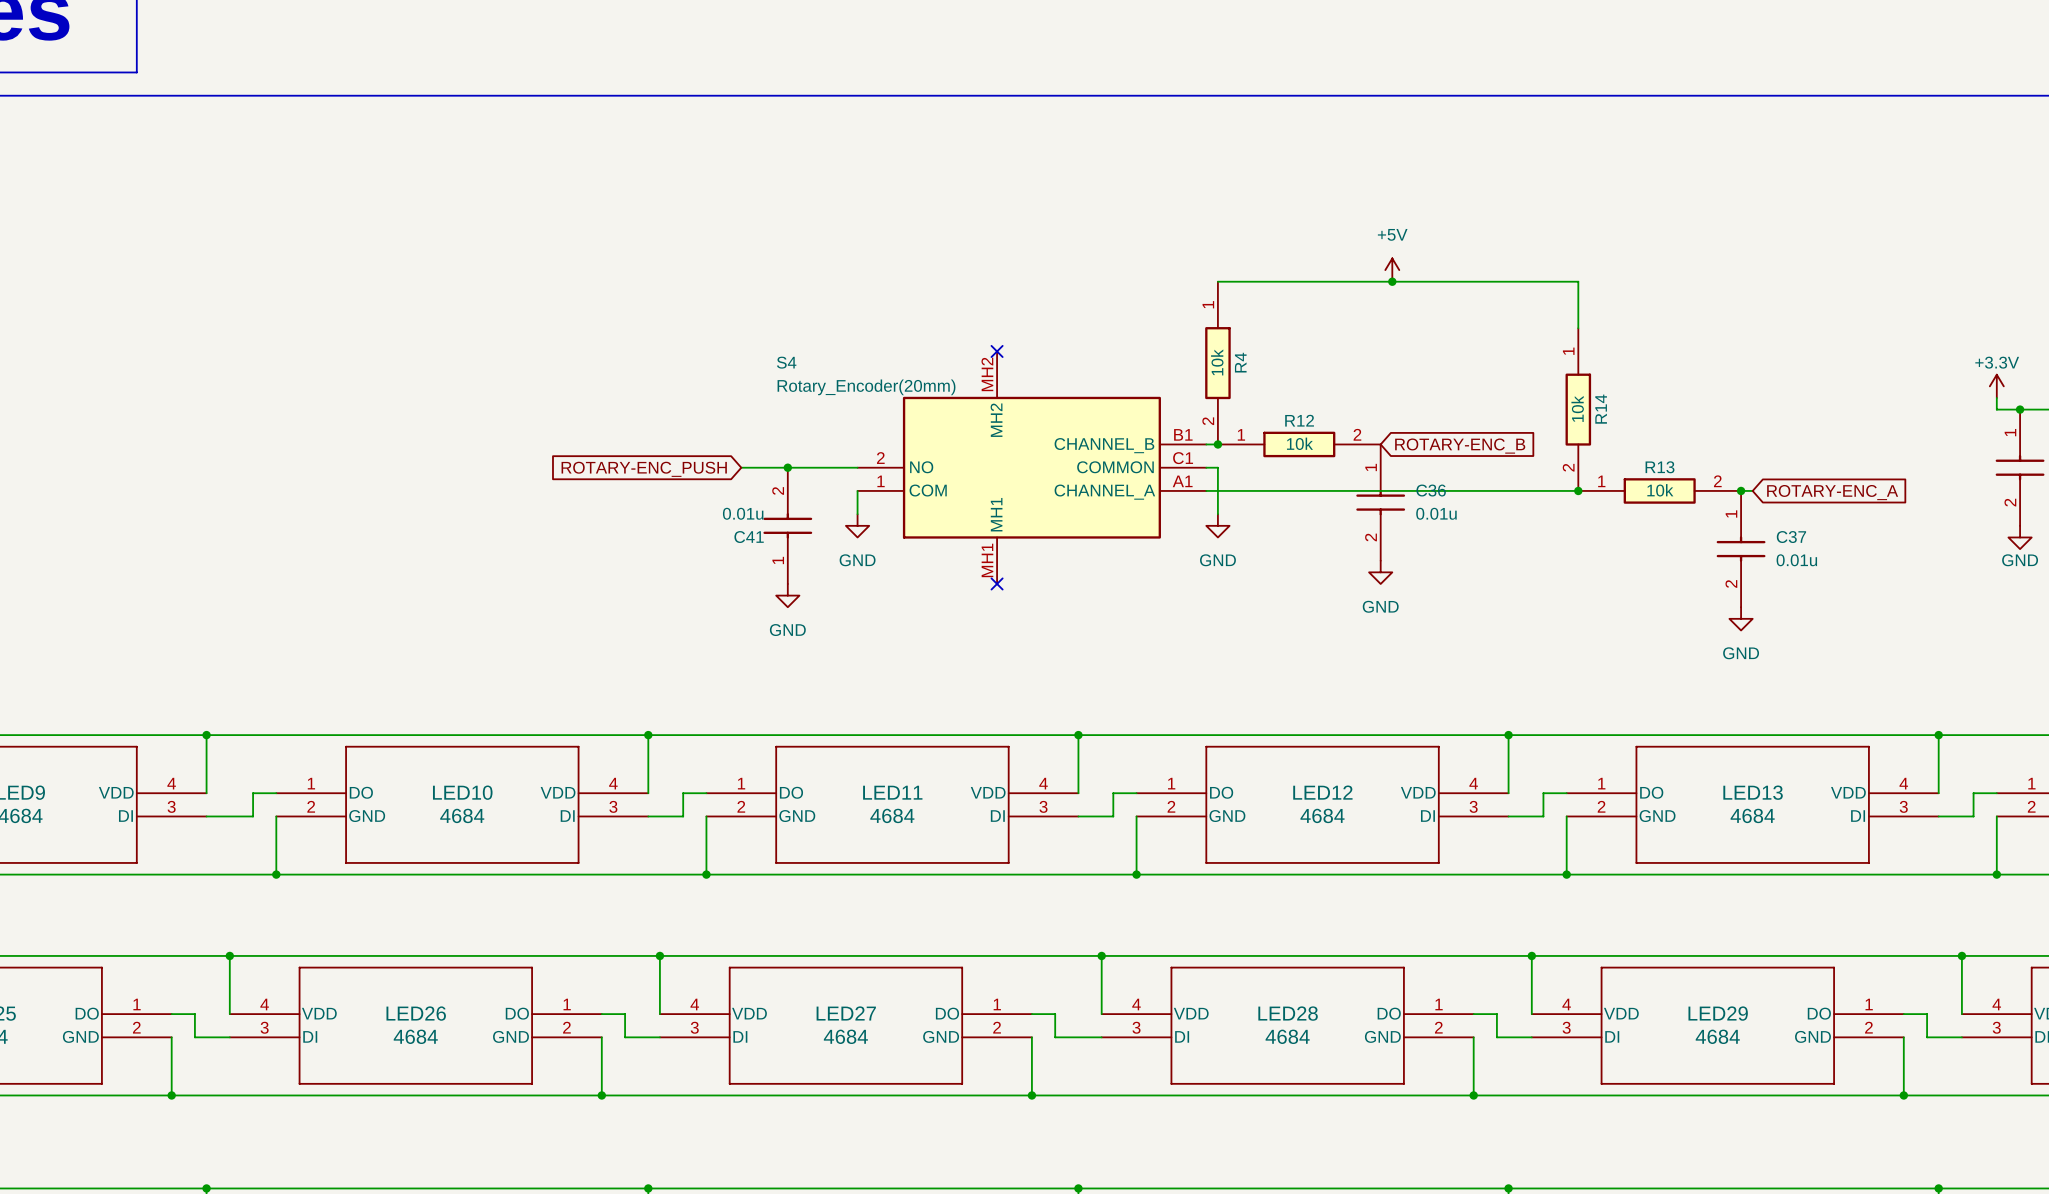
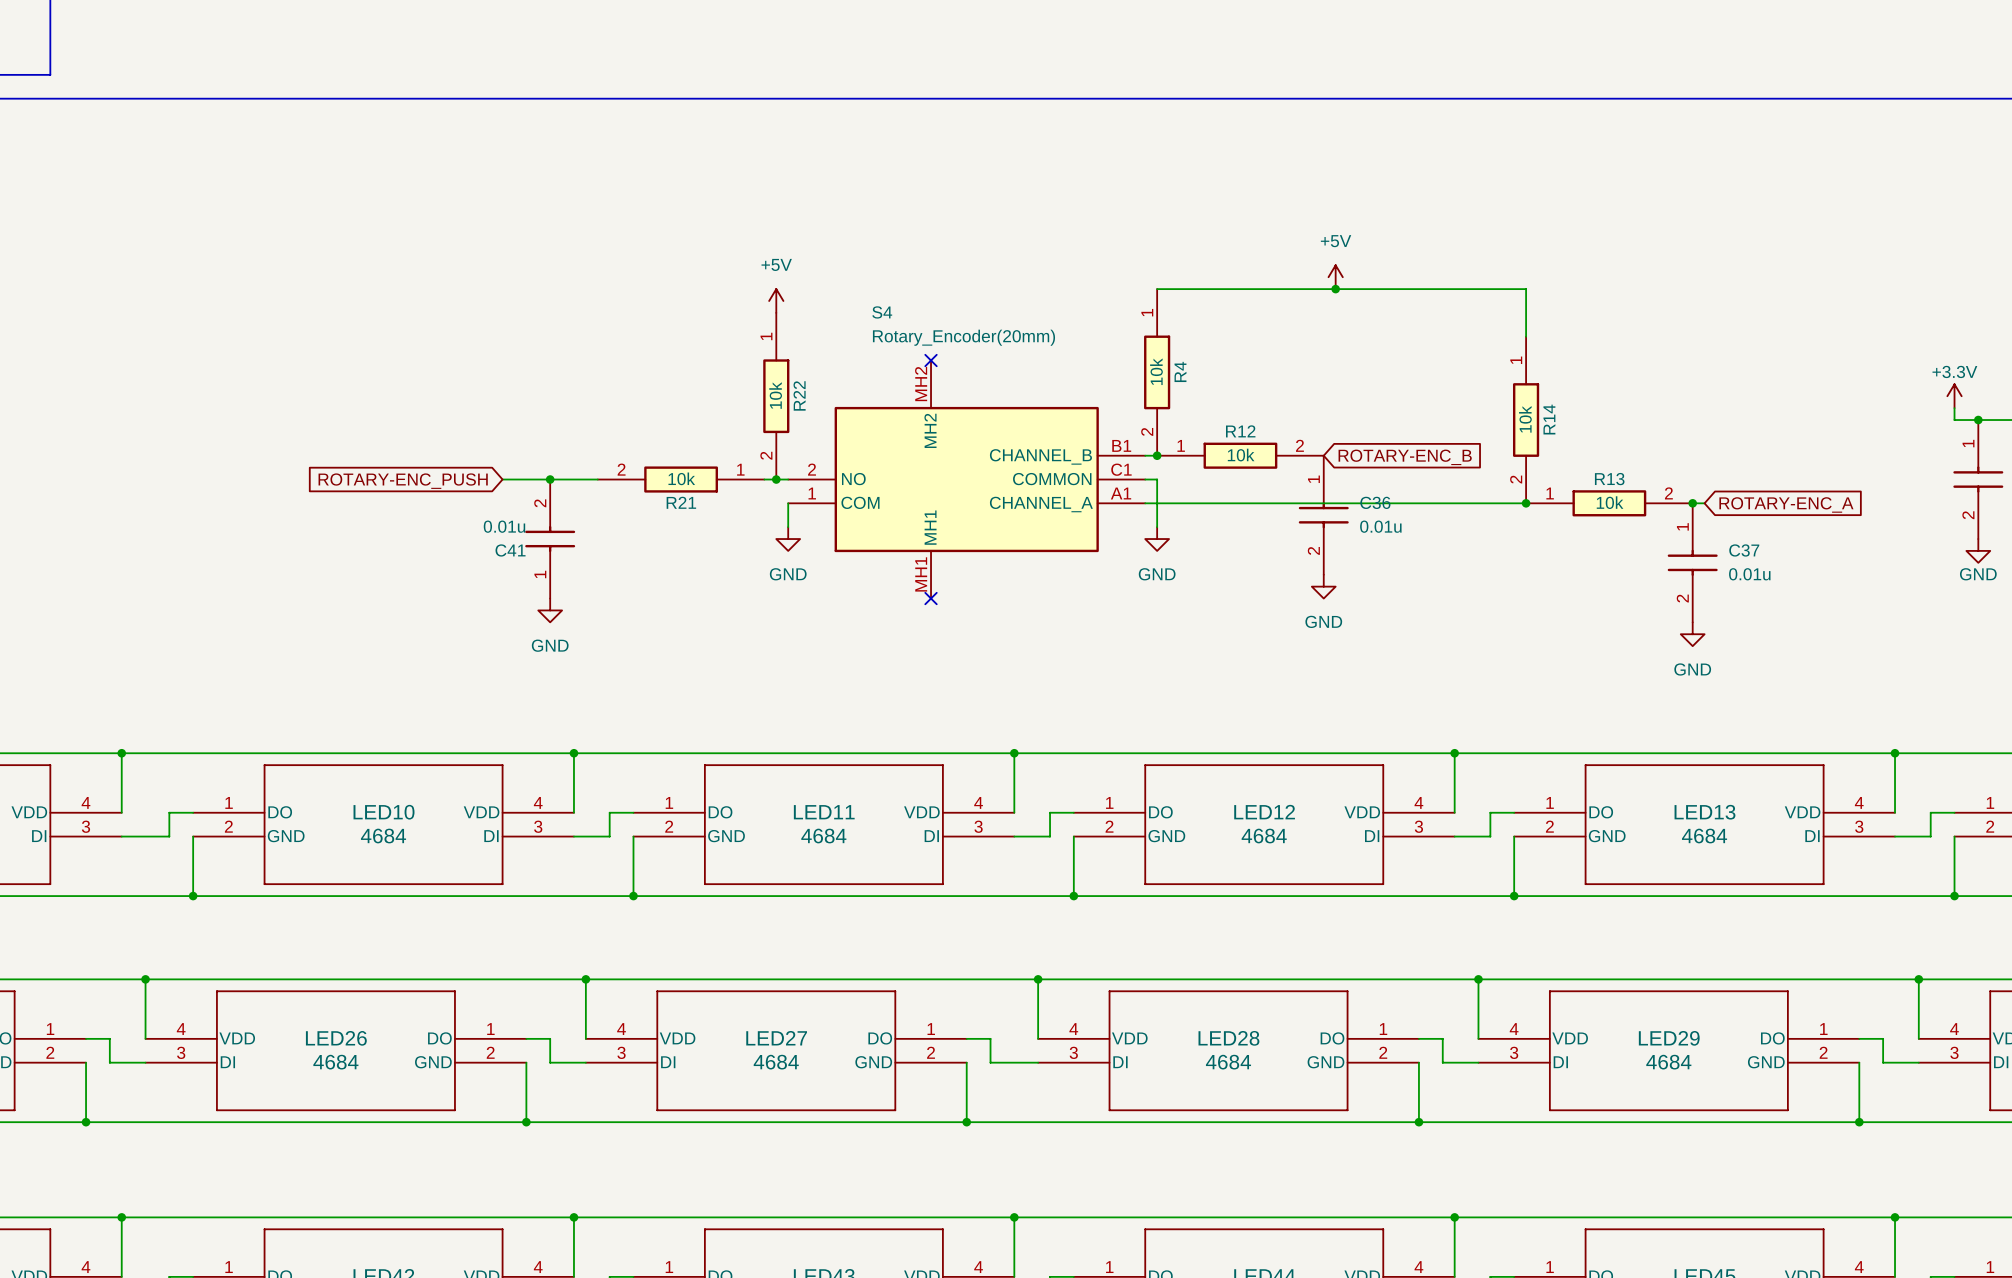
power symbol: none -> +5V (776, 301)
S4 name position: S4 (786, 362) -> S4 (882, 312)
R22: none -> 10k (776, 396)
S4 value position: Rotary_Encoder(20mm) (866, 387) -> Rotary_Encoder(20mm) (963, 337)
junction: none -> (550, 479)
R21: none -> 10k (681, 479)
junction: (787, 467) -> none
junction: none -> (776, 479)
global label position: ROTARY-ENC_PUSH (644, 469) -> ROTARY-ENC_PUSH (403, 481)
C41 position: (787, 525) -> (550, 539)
power symbol position: GND (787, 595) -> GND (550, 610)

